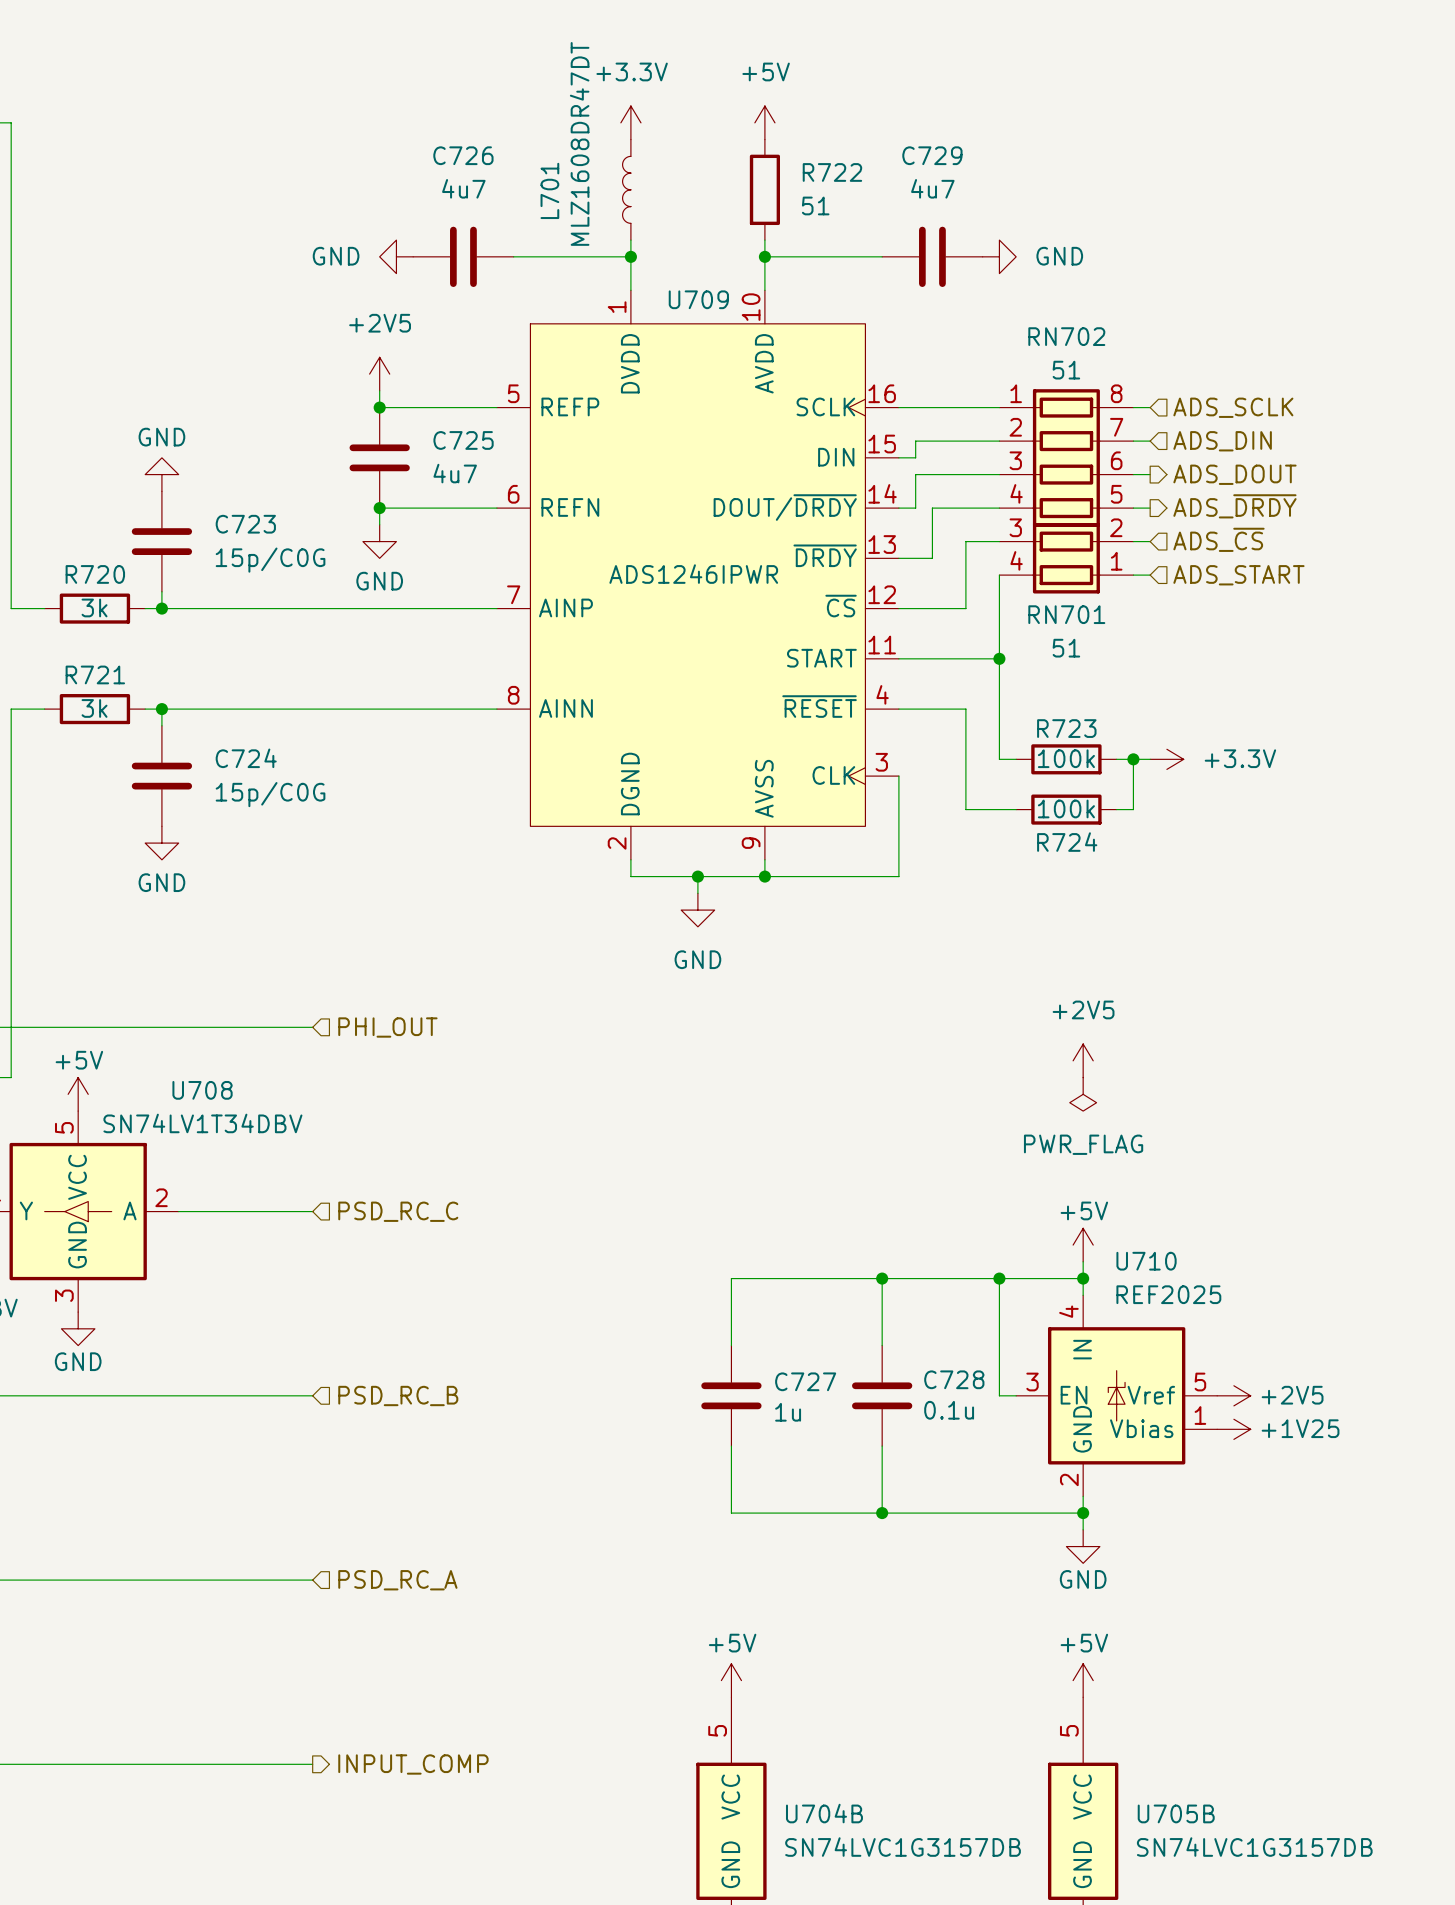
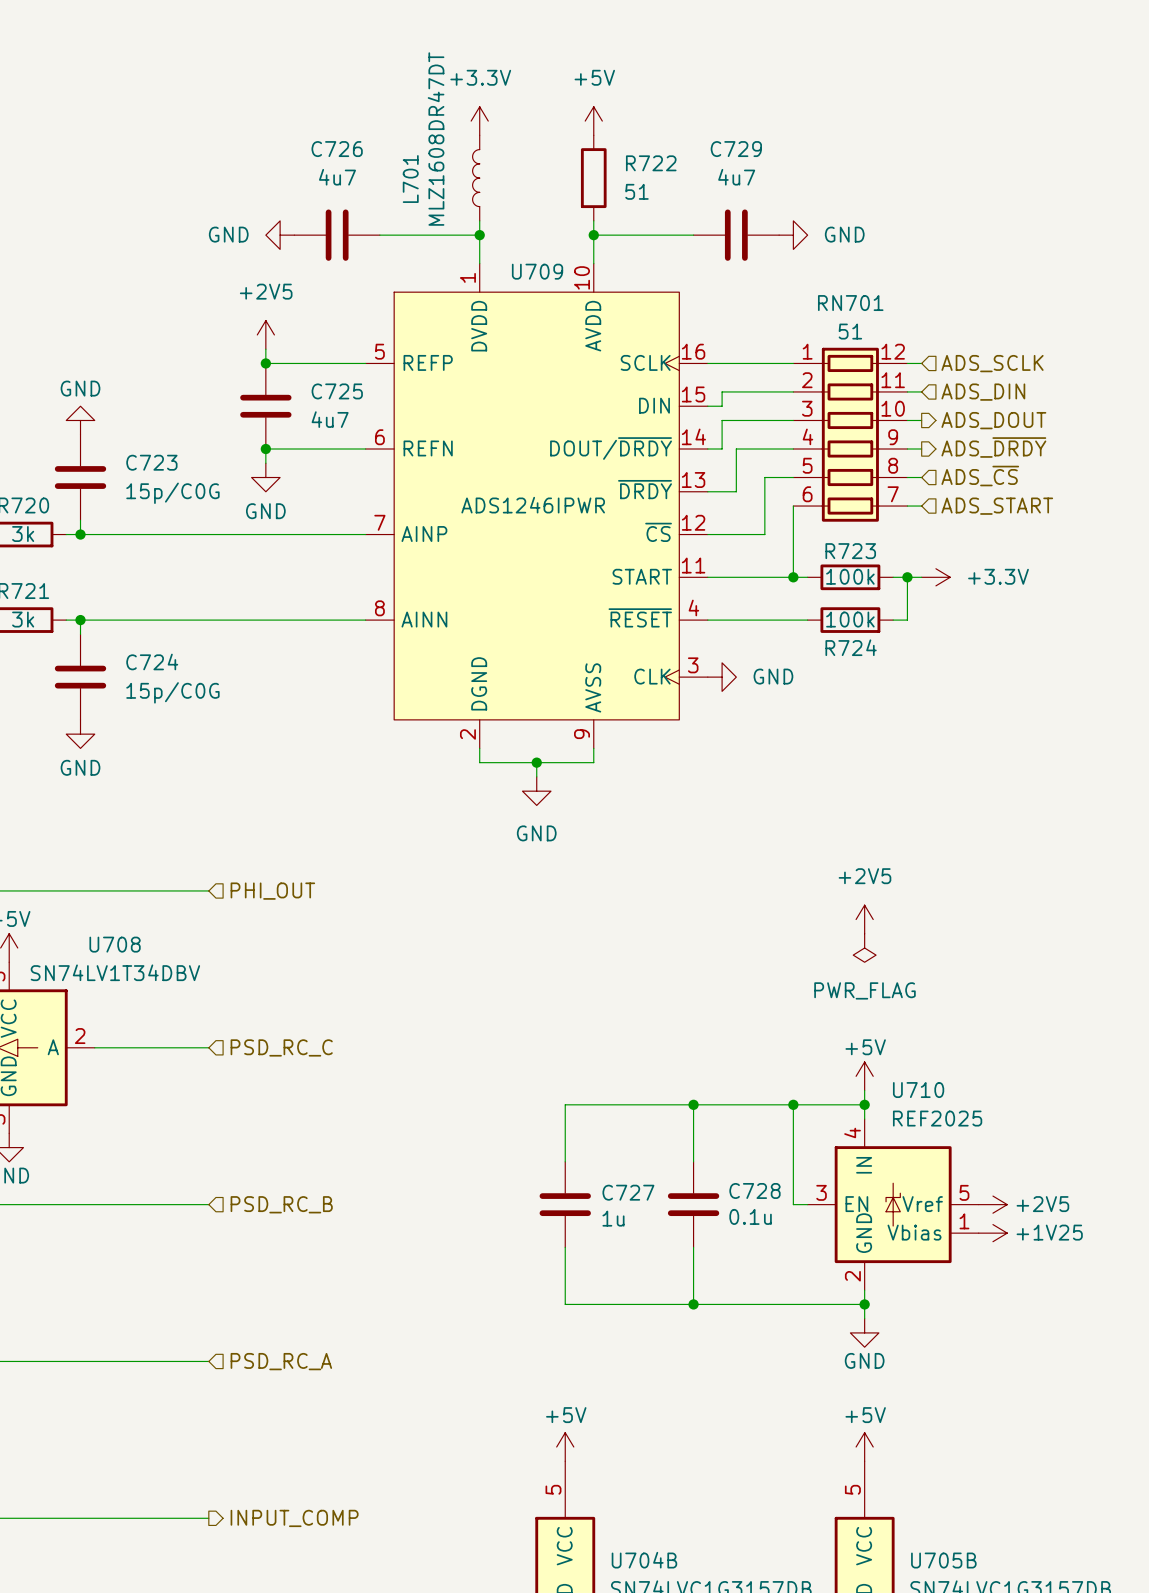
RN702: 51 (1066, 457) -> none
RN701 symbol: [999, 523, 1134, 594] -> [793, 347, 908, 522]
RN701 name position: RN701 (1066, 614) -> RN701 (850, 303)
RN701 value position: 51 (1066, 648) -> 51 (850, 331)
wire: (999, 658) (999, 759) (1016, 759) -> (793, 577) (807, 577)
junction: none -> (907, 577)
wire: (965, 709) (965, 809) (1016, 809) -> (764, 620) (807, 620)
R723 position: (1066, 759) -> (850, 577)
wire: (1116, 759) (1150, 759) -> (893, 577) (921, 577)
wire: (1133, 759) (1133, 809) (1116, 809) -> (907, 577) (907, 620) (893, 620)
junction: (1133, 759) -> none
power symbol position: +3.3V (1166, 759) -> +3.3V (935, 577)
wire: (898, 776) (898, 876) (764, 876) -> none
power symbol: none -> GND (722, 677)
R724 position: (1066, 809) -> (850, 620)
junction: (764, 876) -> none

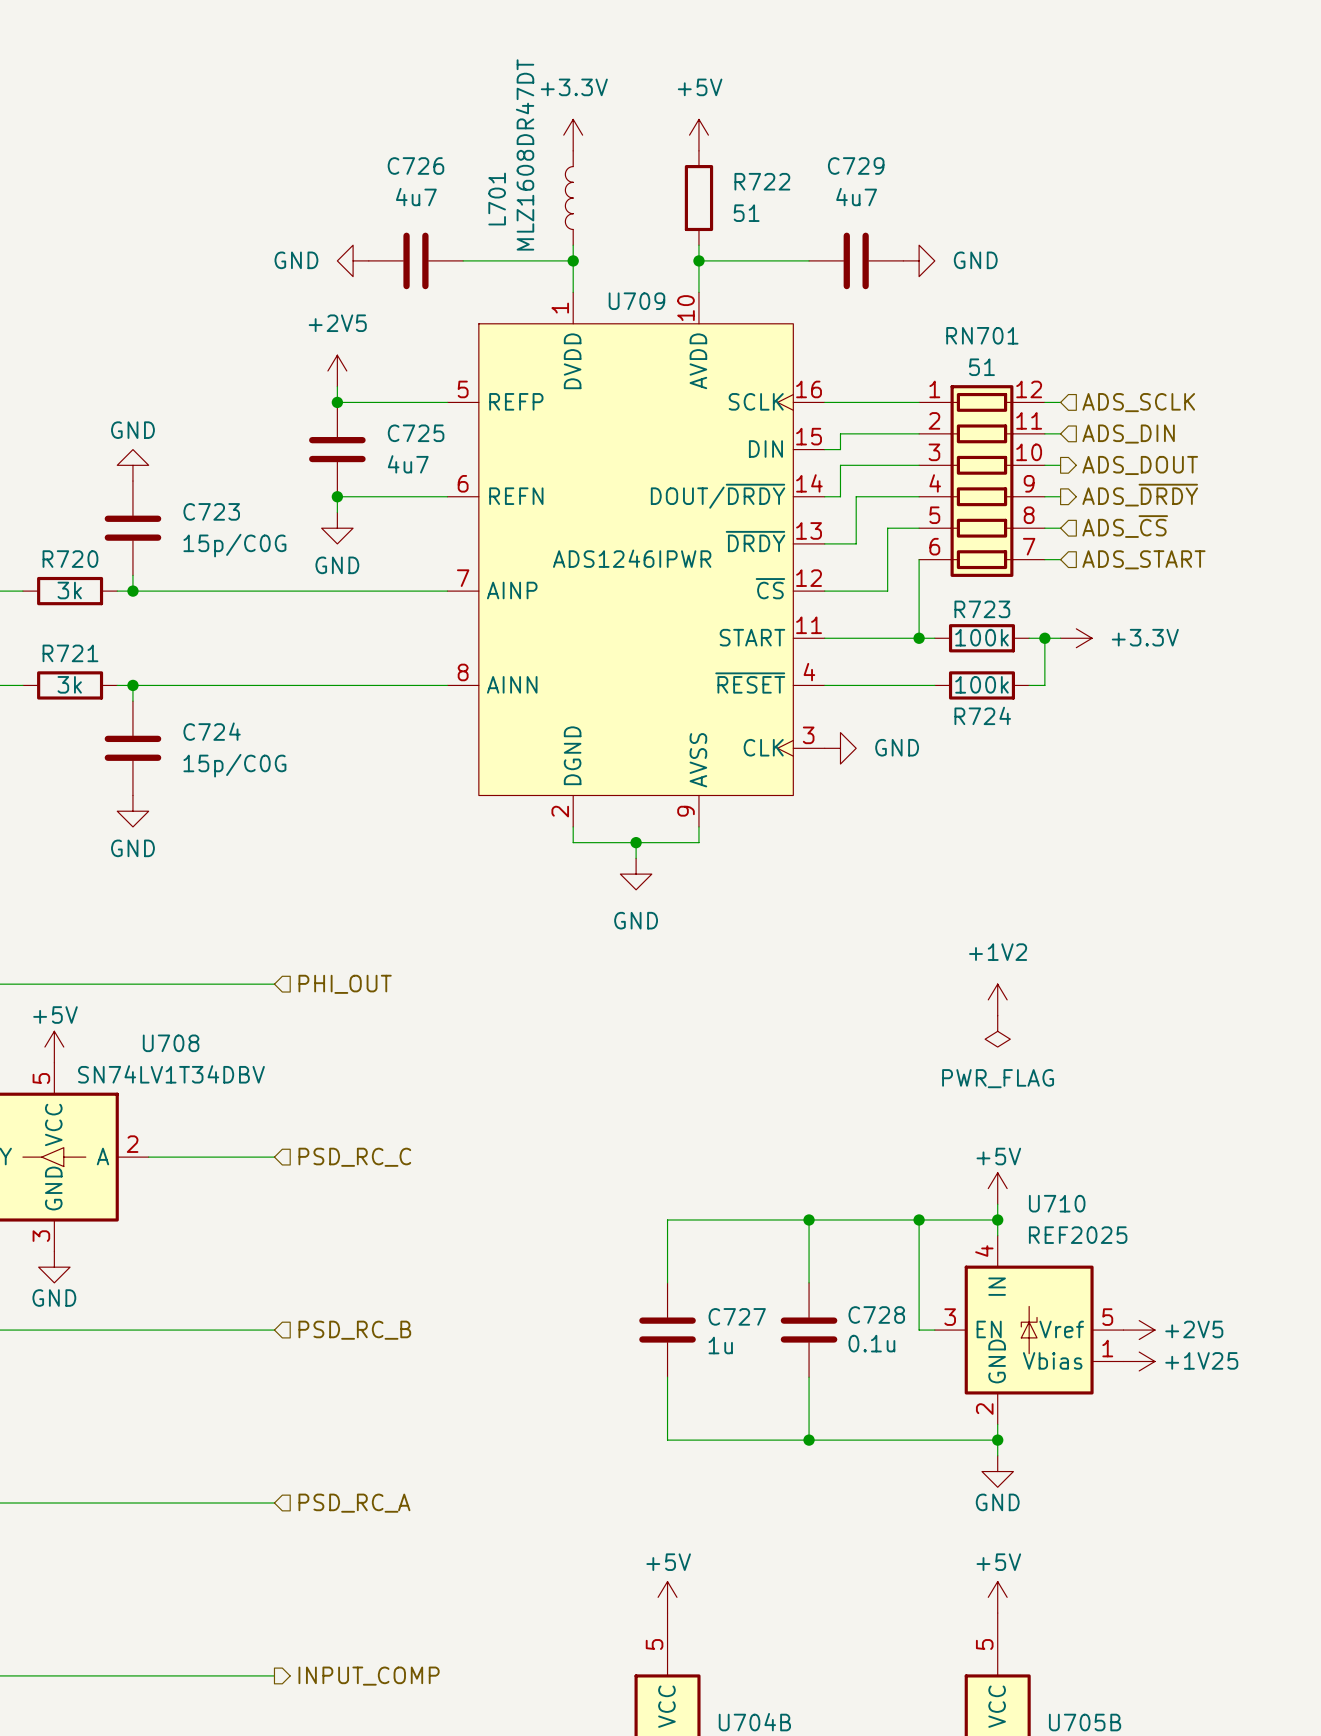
power symbol: none -> +1V2 (997, 999)
power symbol: +2V5 (864, 919) -> none
power symbol position: PWR_FLAG (864, 948) -> PWR_FLAG (997, 1031)

